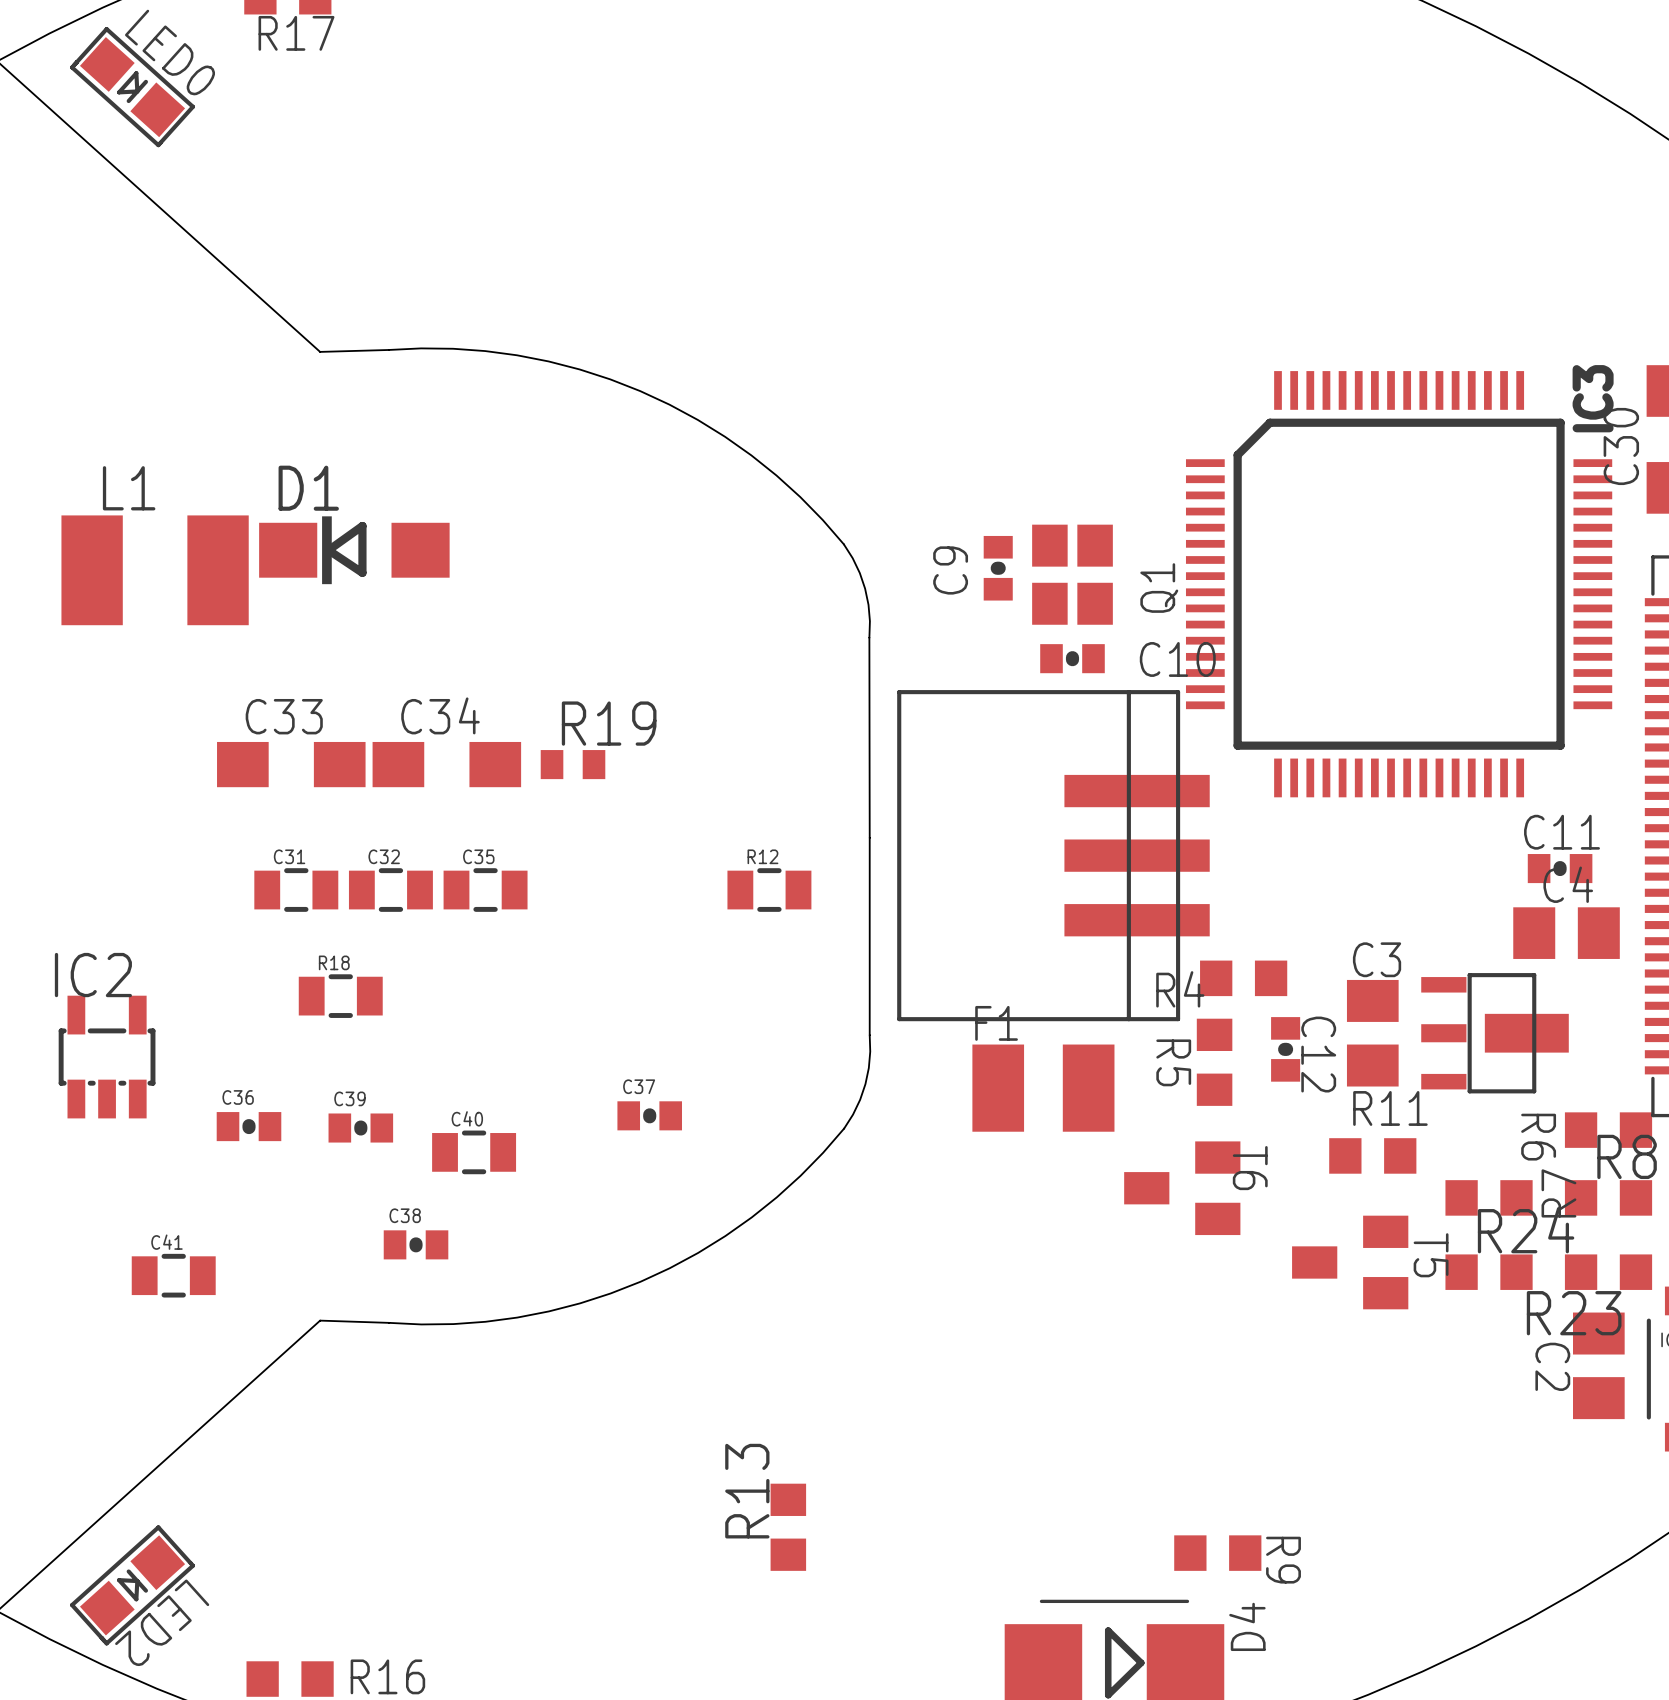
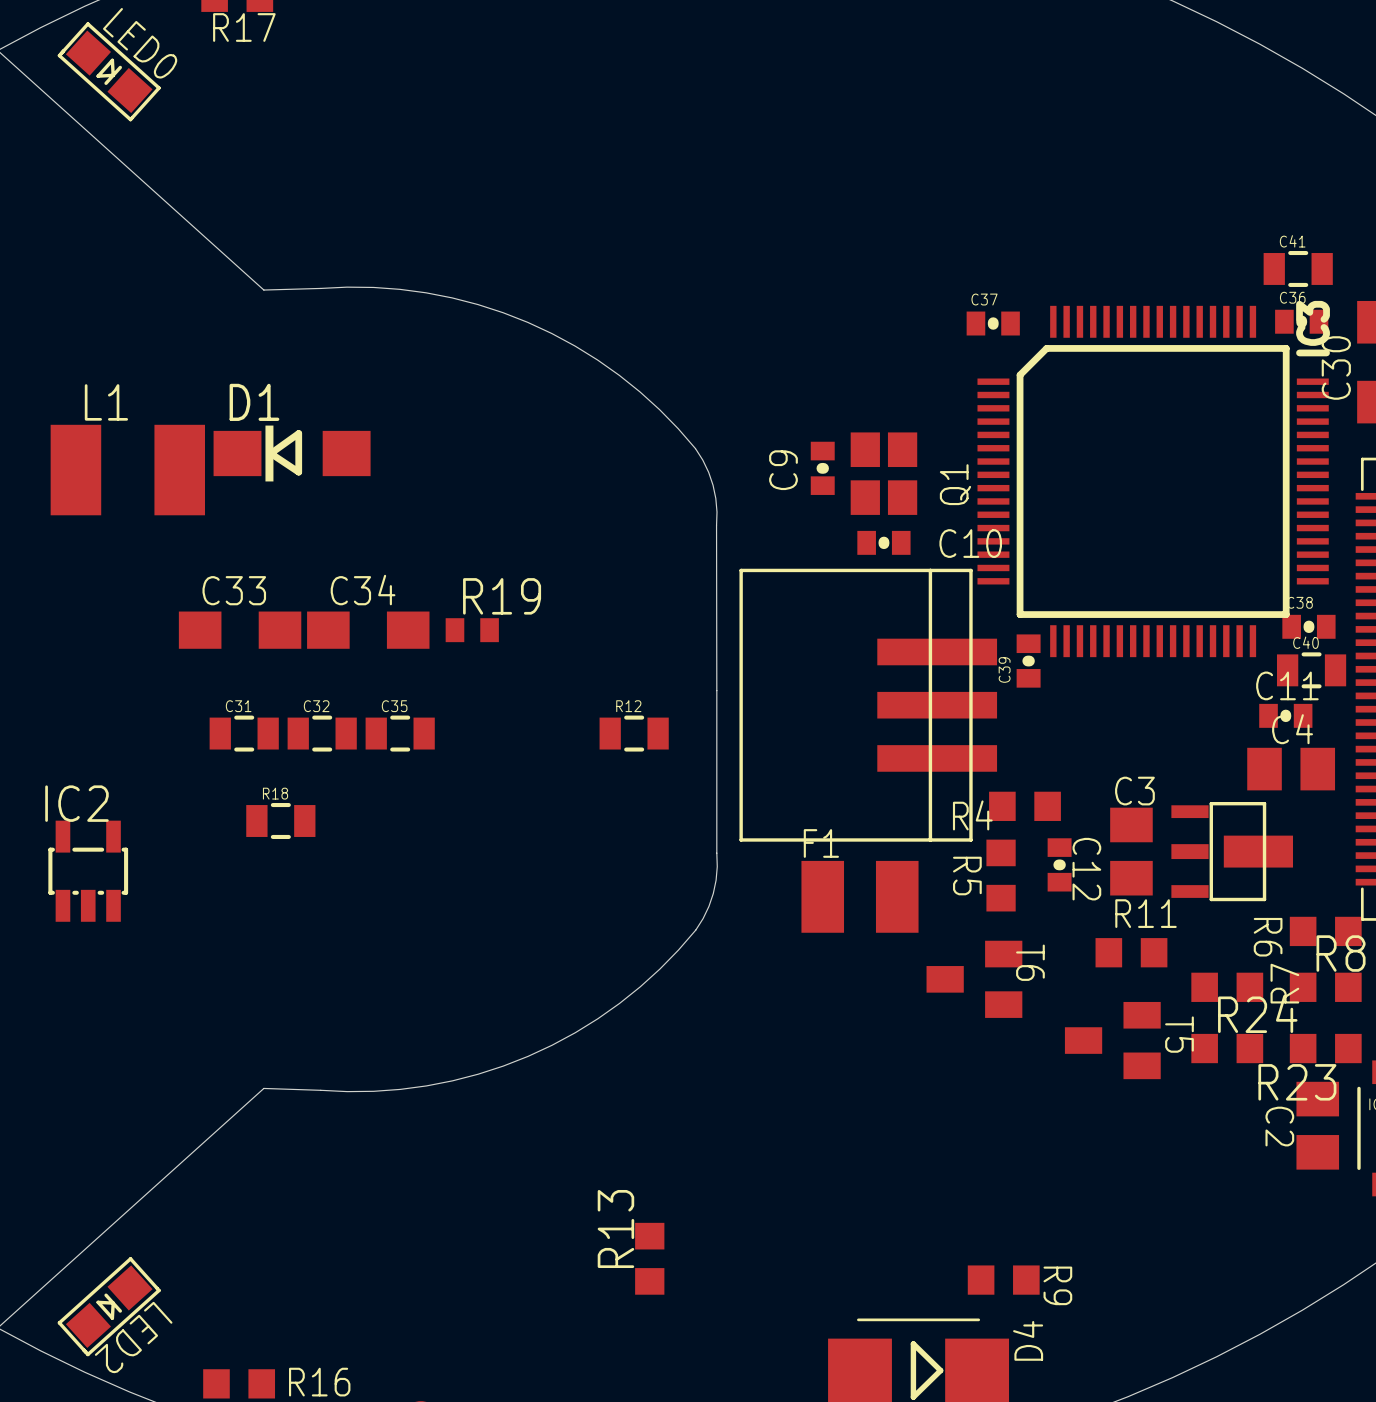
C37 position: (649, 1115) -> (993, 323)
C36 position: (248, 1126) -> (1301, 321)
C39 rotation: 0° (360, 1128) -> 90° clockwise (1028, 661)
C39 position: (360, 1128) -> (1028, 661)
C40 position: (474, 1152) -> (1311, 670)
C38 position: (416, 1244) -> (1308, 626)
C41 position: (173, 1275) -> (1298, 268)

